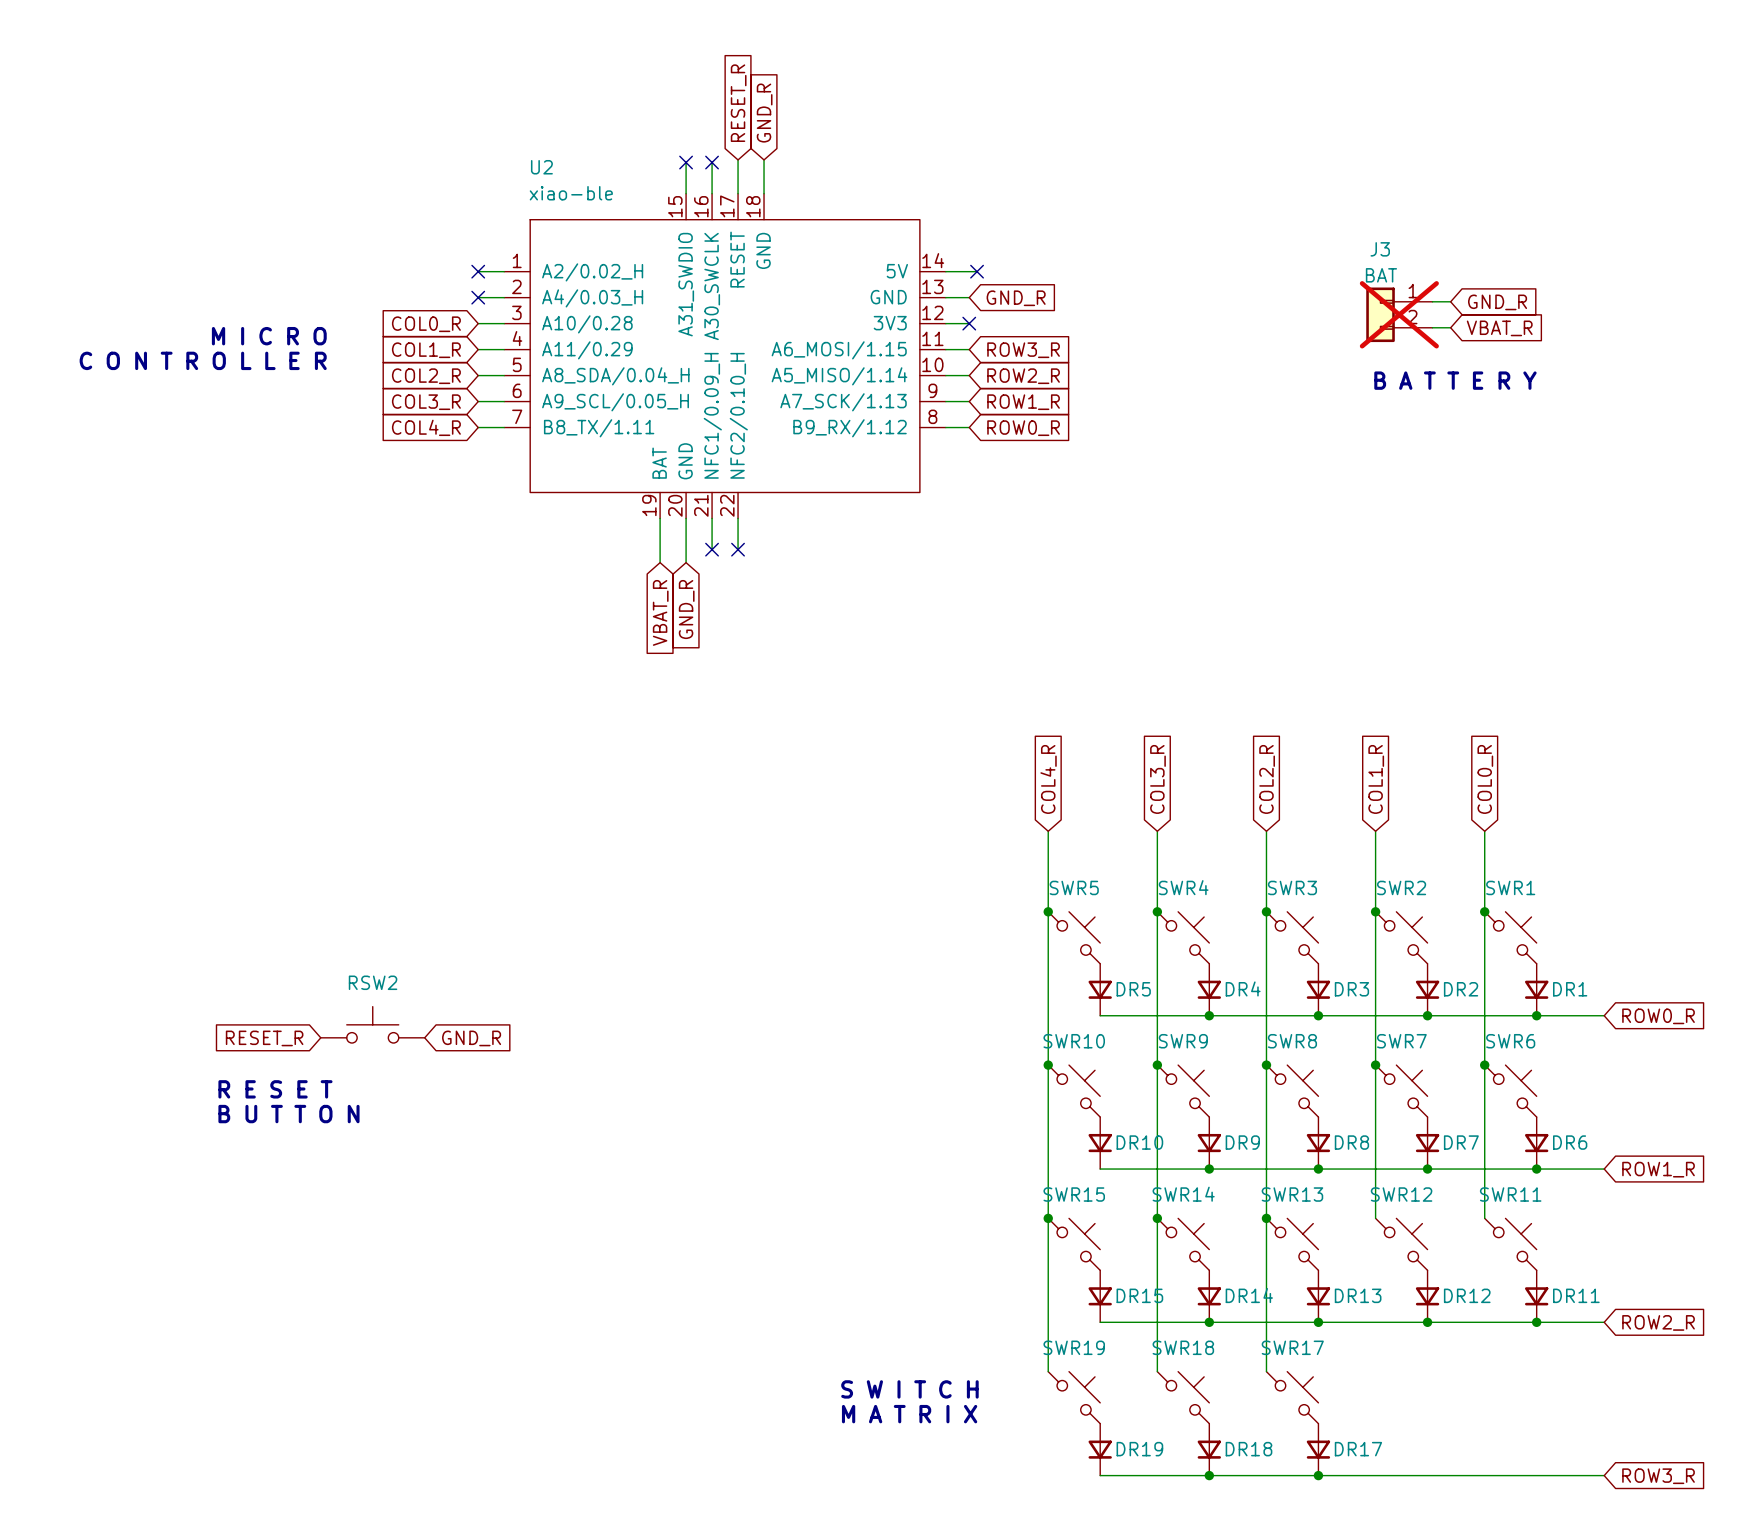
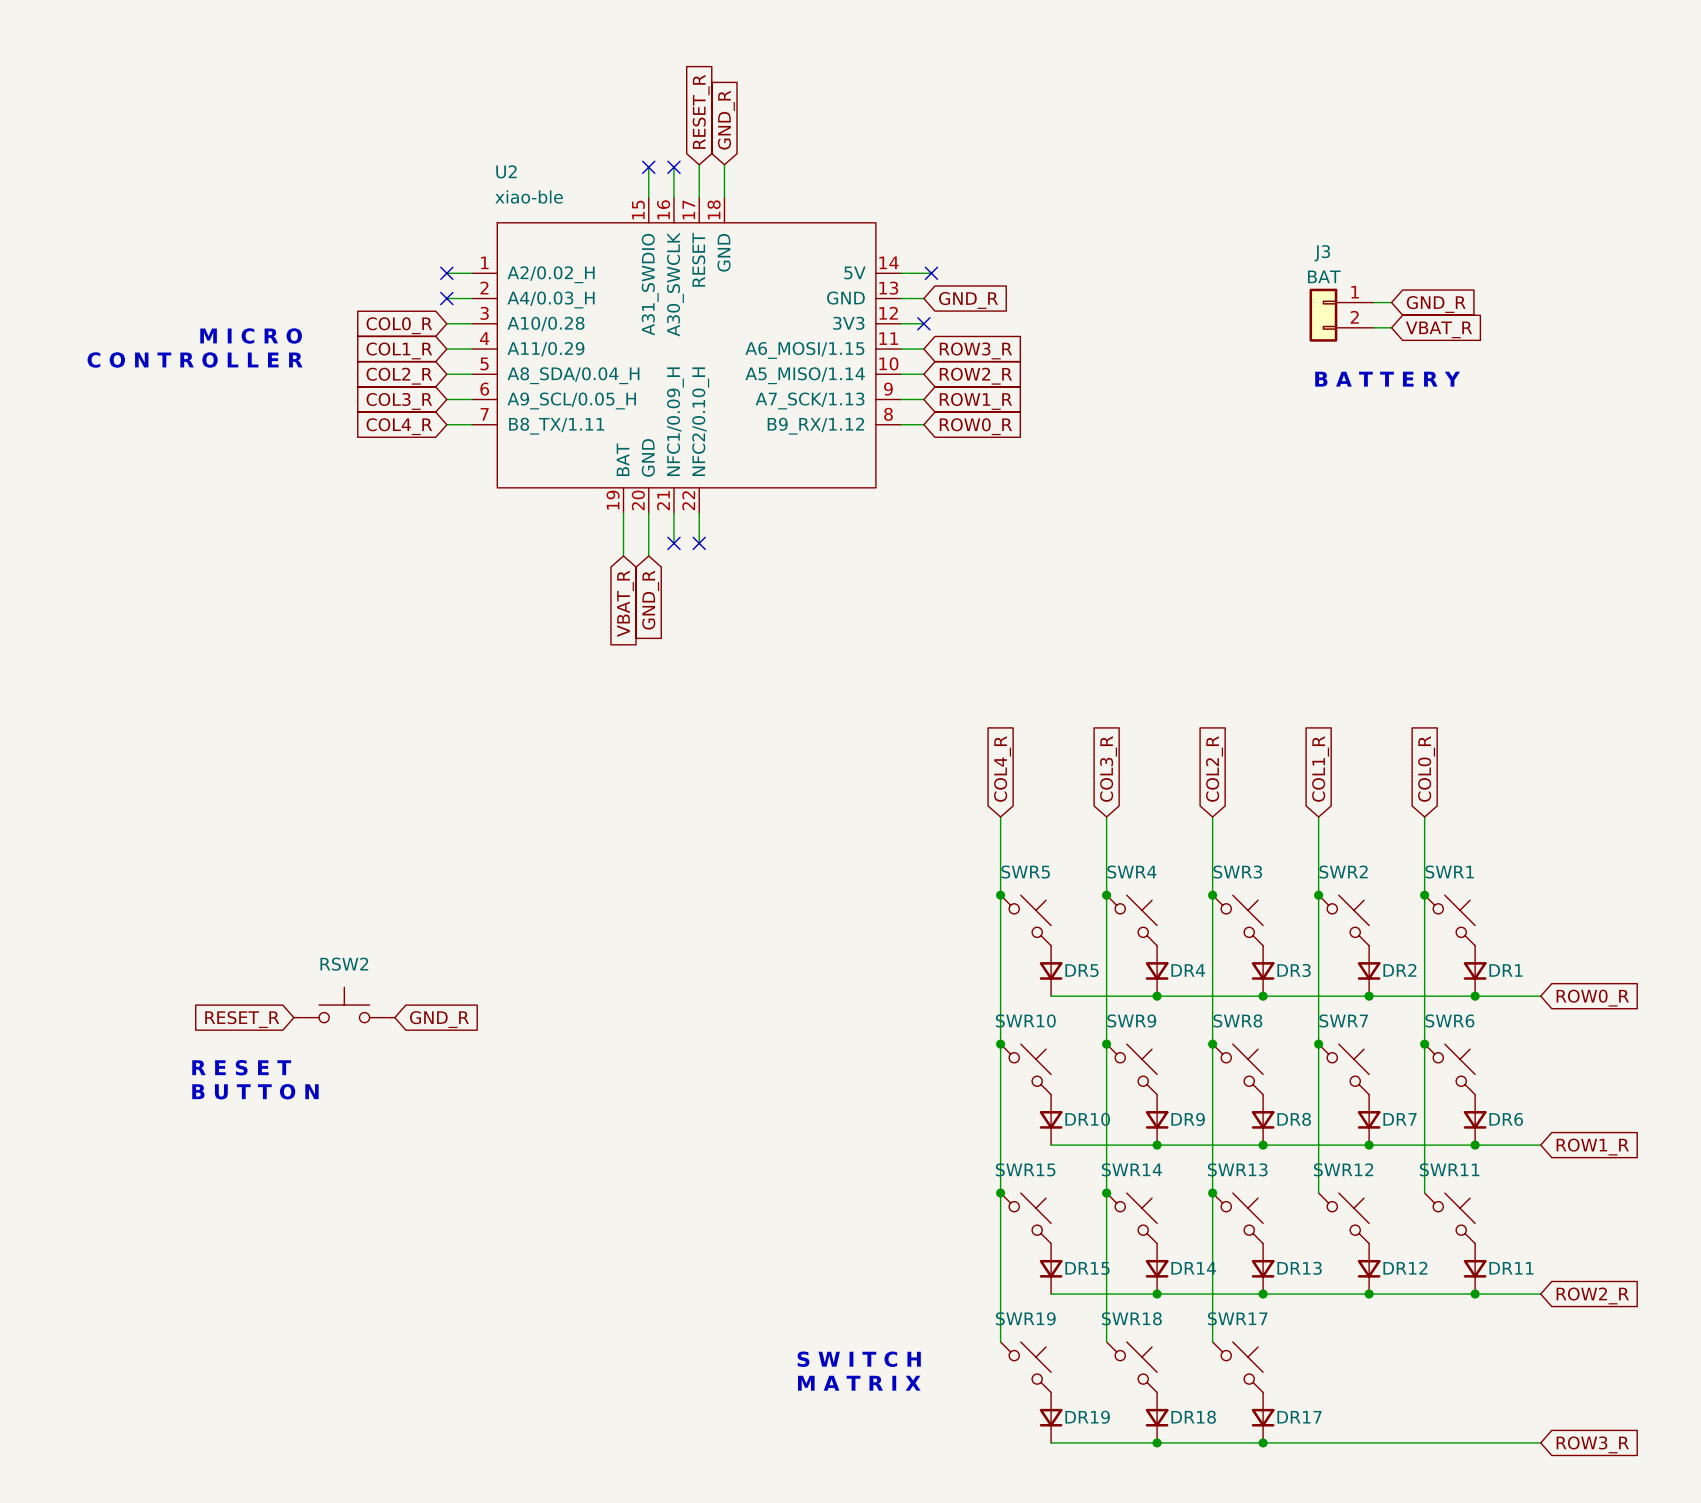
J3 do-not-place cross: (1399, 314) -> none

